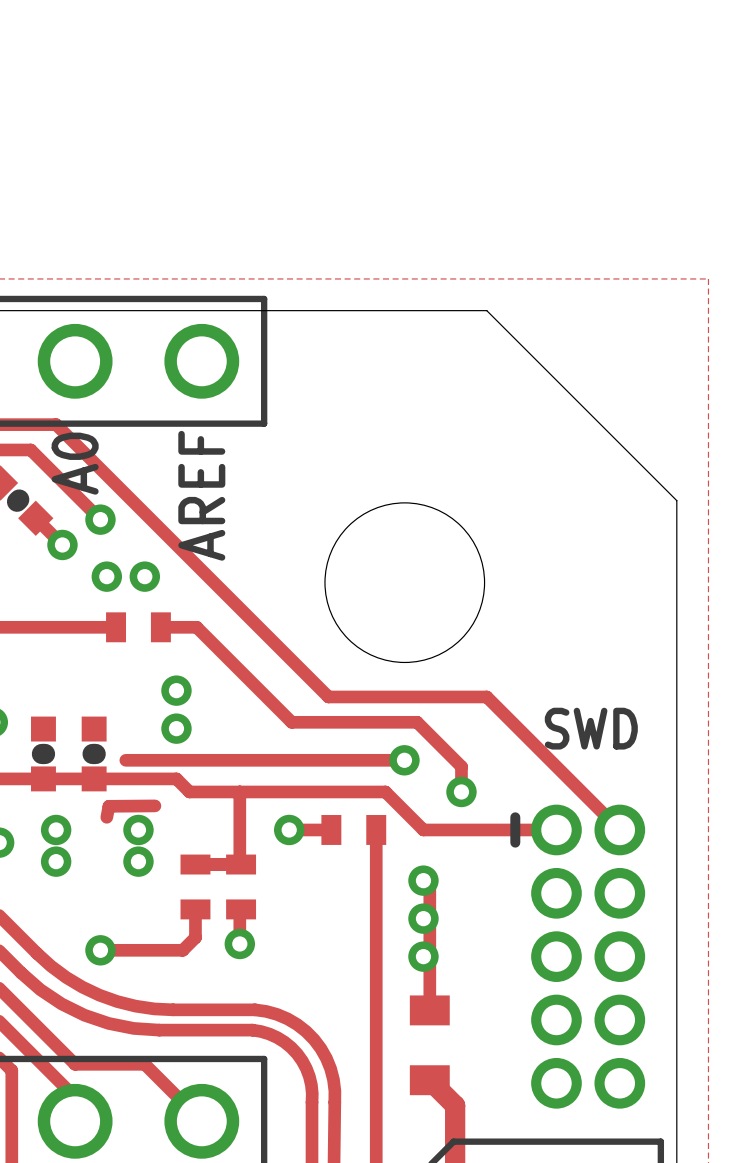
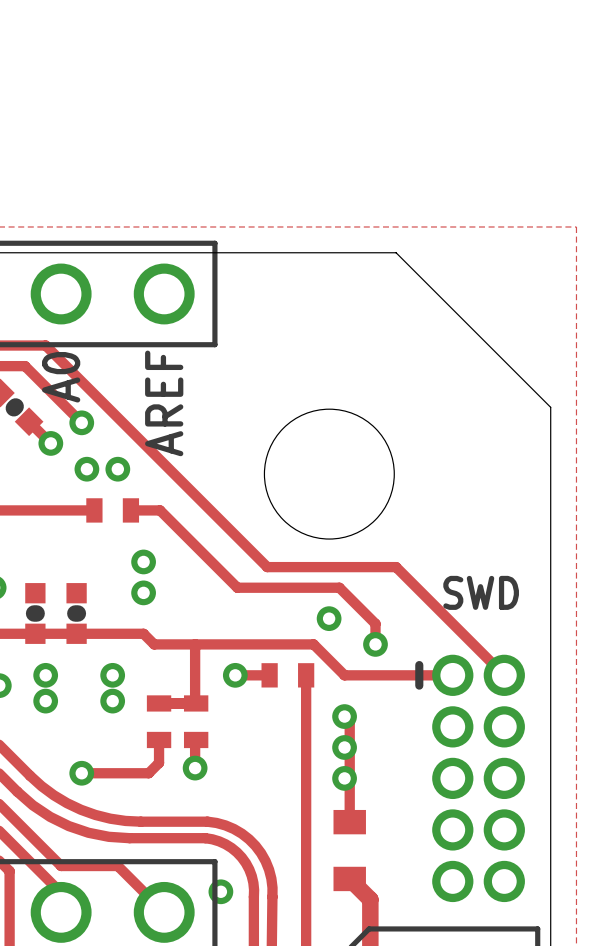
track: (125, 760) (404, 760) -> none
track: (154, 805) (108, 806) (106, 817) -> none
via: none -> (220, 891)

